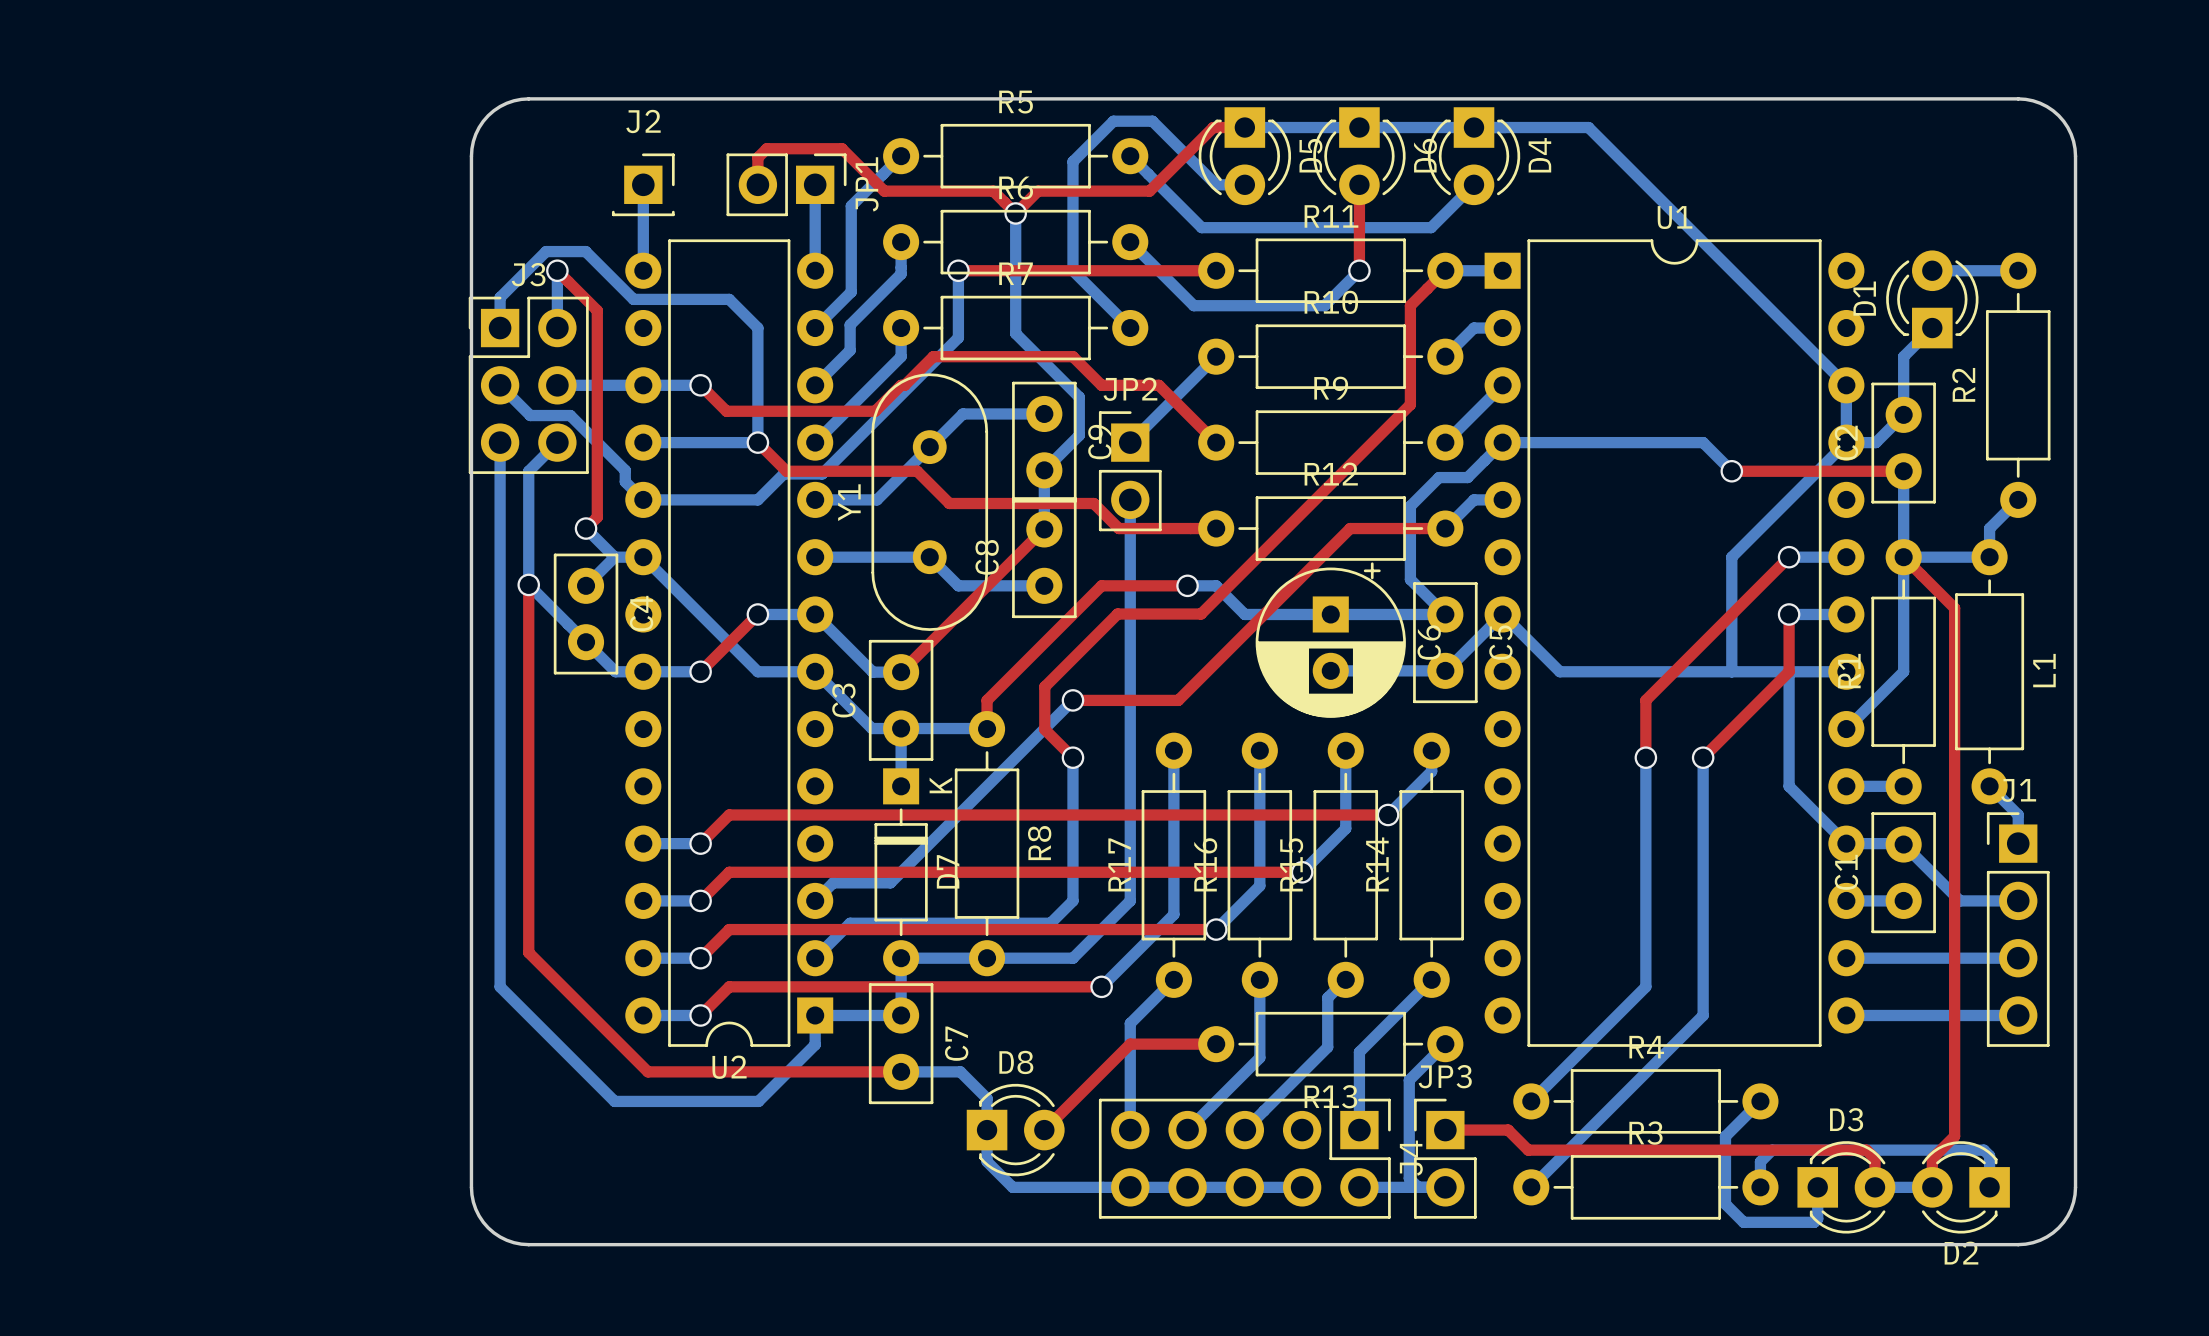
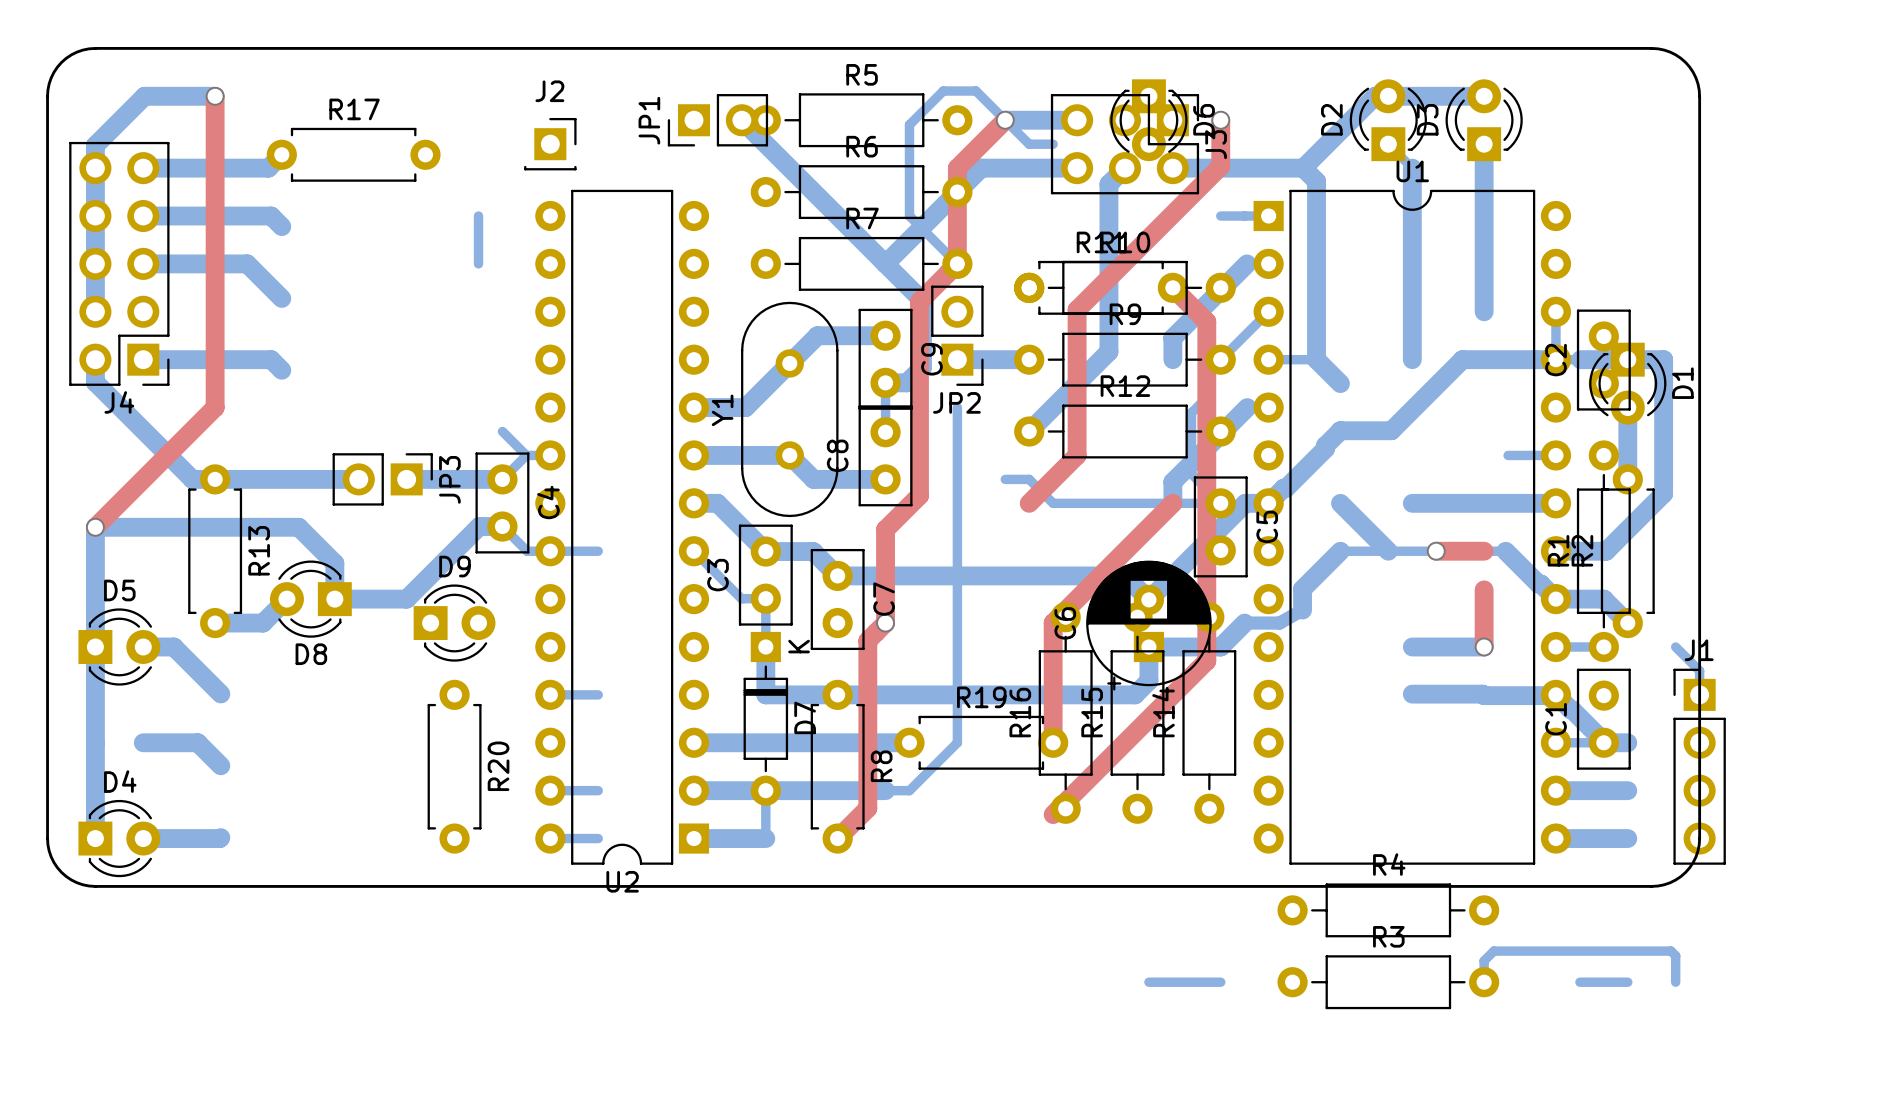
board edge: (528, 98) (2018, 98) (2033, 100) (2053, 110) (2067, 127) (2073, 141) (2075, 156) (2075, 1187) (2071, 1209) (2063, 1222) (2053, 1232) (2040, 1240) (2018, 1244) (528, 1244) (506, 1240) (493, 1232) (479, 1216) (473, 1202) (471, 1187) (471, 156) (475, 134) (488, 115) (506, 103) (528, 98) -> (95, 48) (77, 52) (61, 62) (51, 77) (47, 96) (47, 838) (49, 850) (53, 862) (61, 872) (71, 880) (83, 884) (95, 886) (1651, 886) (1664, 884) (1675, 880) (1685, 872) (1693, 862) (1698, 850) (1699, 838) (1699, 96) (1698, 83) (1693, 72) (1685, 62) (1675, 54) (1664, 50) (1651, 48) (95, 48)
bottom track: none -> (215, 96) (144, 96) (95, 145) (95, 311)
top track: none -> (215, 96) (215, 407) (95, 527)
via: none -> (215, 96)
bottom track: (1244, 127) (1588, 127) (1645, 184) -> none
top track: (1244, 127) (1213, 127) (1149, 191) (1038, 191) (1015, 213) (993, 191) (884, 191) (841, 148) (766, 148) (757, 157) (757, 184) -> none
bottom track: none -> (1484, 96) (1375, 96) (1303, 168)
bottom track: (901, 156) (851, 206) (851, 291) (815, 328) -> none
bottom track: (1130, 156) (1201, 227) (1431, 227) (1474, 184) -> none
bottom track: none -> (1005, 120) (1077, 120)
top track: none -> (1005, 120) (957, 168) (957, 263) (919, 301) (919, 495) (885, 529) (885, 623) (867, 640) (867, 808) (837, 838)
via: none -> (1005, 120)
D5 rotation: 0° (1244, 156) -> 90° counterclockwise (119, 647)
D5 position: (1244, 156) -> (119, 647)
top track: none -> (1220, 120) (1220, 166) (1077, 309) (1077, 455) (1029, 503)
via: none -> (1220, 120)
D4 rotation: 0° (1474, 156) -> 90° counterclockwise (119, 838)
D4 position: (1474, 156) -> (119, 838)
bottom track: (643, 184) (643, 270) -> none
JP1 rotation: 0° (786, 184) -> 180° (717, 120)
bottom track: (815, 184) (815, 270) -> none
top track: (1359, 184) (1359, 270) -> none
bottom track: none -> (1484, 144) (1484, 311)
bottom track: none -> (281, 154) (268, 168) (143, 168)
bottom track: (1015, 213) (1015, 333) (1079, 397) (1079, 435) (1044, 470) -> (741, 120) (922, 300) (922, 367) (906, 382) (885, 382)
via: (1015, 213) -> none
bottom track: none -> (1077, 168) (981, 168) (885, 263)
bottom track: none -> (1124, 168) (1108, 184) (1108, 351) (1029, 431)
bottom track: none -> (1172, 168) (1303, 168)
bottom track: none -> (1303, 168) (1316, 181) (1316, 359) (1340, 383)
bottom track: (1674, 213) (1846, 385) -> (1412, 168) (1412, 359)
R11 footprint: [1198, 238, 1464, 304] -> [1014, 260, 1188, 315]
bottom track: (901, 242) (901, 274) (850, 324) (850, 350) (815, 385) -> none
bottom track: (1130, 242) (1193, 305) (1324, 305) (1359, 270) -> none
R2 footprint: [1985, 252, 2051, 518] -> [1600, 464, 1655, 639]
bottom track: none -> (143, 216) (271, 216) (281, 226)
top track: (557, 270) (597, 310) (597, 517) (586, 528) -> none
via: (557, 270) -> none
bottom track: (958, 270) (958, 337) (822, 473) (783, 473) (757, 499) (643, 499) (625, 481) (625, 470) (570, 415) (530, 415) (500, 385) -> none
top track: (958, 270) (1216, 270) -> none
via: (958, 270) -> none
via: (1359, 270) -> none
top track: (1445, 270) (1410, 305) (1410, 404) (1201, 614) (1117, 614) (1044, 686) (1044, 729) (1072, 757) -> none
bottom track: (1932, 270) (2018, 270) -> none
D1 rotation: 0° (1932, 299) -> 180° (1627, 383)
D1 position: (1932, 299) -> (1627, 383)
bottom track: none -> (143, 263) (247, 263) (281, 298)
bottom track: (500, 328) (500, 297) (546, 251) (585, 251) (633, 299) (729, 299) (757, 328) (757, 442) (643, 442) -> none
bottom track: (901, 328) (901, 356) (815, 442) -> none
bottom track: (1476, 328) (1474, 328) (1445, 356) -> (1247, 263) (1172, 338) (1172, 359)
bottom track: (1932, 328) (1903, 356) (1903, 414) (1875, 442) -> (1555, 551) (1606, 551) (1663, 493) (1663, 359) (1580, 359)
bottom track: (1216, 356) (1130, 442) -> (1029, 359) (957, 359)
top track: none -> (1172, 287) (1206, 321) (1206, 660) (1053, 814)
J3 rotation: 0° (528, 385) -> 90° clockwise (1124, 144)
J3 position: (528, 385) -> (1124, 144)
bottom track: (557, 385) (700, 385) -> none
top track: (700, 385) (726, 411) (875, 411) (933, 356) (1072, 356) (1101, 385) (1158, 385) (1216, 442) -> none
via: (700, 385) -> none
bottom track width: thin (1044, 413) (962, 413) (876, 499) (815, 499) -> thick (885, 335) (817, 335) (745, 407) (694, 407)
bottom track: none -> (95, 359) (95, 382) (192, 479) (358, 479)
bottom track: none -> (143, 359) (271, 359) (281, 370)
bottom track: (500, 442) (500, 986) (614, 1101) (758, 1101) (815, 1044) (815, 1015) -> none
bottom track: (557, 442) (528, 471) (528, 584) (586, 642) -> (95, 838) (95, 527) (298, 527) (334, 563) (334, 599) (406, 599) (479, 526) (502, 526)
top track: (757, 442) (786, 471) (917, 471) (949, 503) (1093, 503) (1118, 528) (1216, 528) -> none
via: (757, 442) -> none
bottom track: (1502, 442) (1467, 477) (1439, 477) (1428, 487) -> none
bottom track: (1559, 442) (1703, 442) (1731, 471) -> none
bottom track: (1846, 442) (1731, 557) (1731, 671) -> (1555, 359) (1462, 359) (1391, 430) (1340, 430)
JP2 rotation: 0° (1130, 471) -> 180° (957, 335)
top track: (1731, 471) (1903, 471) -> none
via: (1731, 471) -> none
bottom track: (1903, 471) (1903, 671) (1846, 729) -> none
bottom track: (1477, 499) (1474, 499) (1445, 528) -> (1247, 407) (1172, 482) (1172, 503)
bottom track: none -> (1627, 407) (1627, 479)
bottom track: (2018, 499) (1989, 528) (1989, 557) (1903, 557) -> none
bottom track: none -> (1340, 430) (1325, 445) (1325, 448) (1268, 503) (1245, 503) (1148, 599) (1124, 575) (837, 575) (813, 551) (765, 551) (717, 503) (694, 503)
via: (586, 528) -> none
top track: (1445, 528) (1350, 528) (1178, 700) (1072, 700) -> none
top track: (1044, 529) (901, 672) -> none
bottom track: (643, 557) (757, 671) (815, 671) -> none
bottom track width: thin (815, 557) (929, 557) (958, 585) (1044, 585) -> thick (694, 455) (789, 455) (813, 479) (885, 479)
top track: (1789, 557) (1645, 700) (1645, 757) -> none
via: (1789, 557) -> none
top track: (1903, 557) (1954, 608) (1954, 1136) (1932, 1158) (1932, 1187) -> none
top track: (528, 584) (528, 952) (647, 1071) (901, 1071) -> none
via: (528, 584) -> none
bottom track: none -> (406, 479) (502, 479)
top track: (1187, 585) (1101, 585) (987, 700) (987, 729) -> none
via: (1187, 585) -> none
bottom track: (757, 614) (815, 614) (872, 672) (901, 672) -> none
top track: (757, 614) (700, 671) -> none
via: (757, 614) -> none
top track: none -> (1172, 503) (1053, 623) (1053, 742)
bottom track: none -> (1340, 503) (1388, 551)
bottom track: none -> (1412, 503) (1508, 503)
bottom track width: thin (1789, 614) (1846, 614) -> thick (1508, 503) (1555, 503)
top track: (1789, 614) (1789, 671) (1703, 757) -> none
via: (1789, 614) -> none
C6 rotation: 0° (1330, 640) -> 180° (1148, 625)
C6 position: (1330, 640) -> (1148, 625)
via: none -> (95, 527)
bottom track: (1330, 670) (1446, 670) (1502, 614) (1559, 671) (1588, 671) -> (765, 647) (765, 694) (1134, 694) (1148, 680) (1148, 647) (1220, 647) (1244, 623) (1279, 623) (1302, 610) (1302, 589) (1340, 551)
via: (700, 671) -> none
top track: none -> (1436, 551) (1484, 551)
via: none -> (1436, 551)
bottom track: (1786, 671) (1846, 671) -> (1505, 551) (1555, 599) (1603, 599) (1627, 623)
bottom track: (1789, 671) (1789, 786) (1846, 843) (1902, 843) (1960, 900) (2018, 900) -> none
L1: (1989, 671) -> none
bottom track: (1072, 700) (890, 882) (833, 882) (815, 900) -> (909, 742) (694, 742)
via: (1072, 700) -> none
R8 footprint: [954, 711, 1020, 977] -> [810, 679, 865, 854]
top track: none -> (1484, 589) (1484, 647)
bottom track: (901, 728) (987, 729) -> none
bottom track: none -> (286, 599) (263, 623) (215, 623)
R17 footprint: [1141, 732, 1207, 998] -> [266, 127, 441, 182]
bottom track: (1173, 750) (1173, 914) (1101, 986) -> none
bottom track: (1259, 750) (1259, 885) (1216, 929) -> none
bottom track: (1345, 750) (1345, 828) (1302, 872) -> none
bottom track: (1431, 750) (1431, 771) (1388, 814) -> none
D9: none -> (454, 623)
bottom track: (1072, 757) (1072, 900) (1050, 923) (850, 923) (815, 958) -> (765, 790) (694, 790)
via position: (1072, 757) -> (885, 623)
bottom track: (1645, 757) (1645, 986) (1531, 1101) -> none
via: (1645, 757) -> none
bottom track: (1703, 757) (1703, 1015) (1531, 1187) -> none
via: (1703, 757) -> none
bottom track: none -> (143, 647) (173, 647) (220, 693)
via: none -> (1484, 647)
top track: (1388, 814) (729, 814) (700, 843) -> none
via: (1388, 814) -> none
bottom track: none -> (1412, 694) (1555, 694) (1605, 742) (1627, 742)
via: (700, 843) -> none
R17 name position: R17 (1119, 864) -> R17 (354, 109)
top track: (1302, 872) (729, 872) (700, 900) -> none
via: (1302, 872) -> none
bottom track: none -> (143, 742) (197, 742) (220, 765)
bottom track: (643, 900) (700, 900) -> none
via: (700, 900) -> none
R19: none -> (981, 742)
R20: none -> (454, 766)
top track: (1216, 929) (729, 929) (700, 958) -> none
via: (1216, 929) -> none
via: (700, 958) -> none
bottom track width: thin (901, 958) (1044, 958) -> thick (765, 790) (885, 790)
bottom track width: thin (1846, 958) (1932, 958) -> thick (1555, 790) (1627, 790)
bottom track: (1932, 958) (2018, 958) -> (1412, 647) (1484, 647)
bottom track: (1173, 979) (1130, 1023) (1130, 1130) -> none
bottom track: (1259, 979) (1259, 1057) (1187, 1130) -> none
bottom track: (1345, 979) (1327, 997) (1327, 1047) (1244, 1130) -> none
bottom track: (1431, 979) (1359, 1052) (1359, 1130) -> none
top track: (1101, 986) (729, 986) (700, 1015) -> none
via: (1101, 986) -> none
R13 footprint: [1198, 1011, 1464, 1077] -> [188, 464, 243, 639]
bottom track: none -> (220, 837) (143, 838)
via: (700, 1015) -> none
bottom track width: thin (815, 1015) (901, 1015) -> thick (694, 838) (765, 838)
bottom track width: thin (1846, 1015) (1932, 1015) -> thick (1555, 838) (1627, 838)
bottom track: (1932, 1015) (2018, 1015) -> none
C7 position: (901, 1043) -> (837, 599)
top track: (1216, 1044) (1130, 1044) (1044, 1130) -> none
bottom track: (1445, 1044) (1409, 1080) (1409, 1178) (1418, 1187) -> none
bottom track: (901, 1071) (960, 1071) (987, 1098) (987, 1161) (1012, 1187) (1302, 1187) -> none
R13 name position: R13 (1330, 1096) -> R13 (259, 550)
bottom track: (1760, 1101) (1725, 1136) (1725, 1204) (1743, 1222) (1814, 1222) (1817, 1218) (1817, 1187) -> none
D8 rotation: 0° (1015, 1130) -> 180° (310, 599)
D8 position: (1015, 1130) -> (310, 599)
top track: (1445, 1130) (1508, 1130) (1528, 1150) (1866, 1150) (1875, 1158) (1875, 1187) -> none
J4 rotation: 0° (1244, 1158) -> 90° clockwise (119, 263)
J4 position: (1244, 1158) -> (119, 263)
JP3 rotation: 0° (1445, 1158) -> 90° clockwise (382, 479)
JP3 position: (1445, 1158) -> (382, 479)
D3 rotation: 0° (1846, 1187) -> 90° counterclockwise (1484, 120)
D3 position: (1846, 1187) -> (1484, 120)
D2 rotation: 0° (1960, 1187) -> 90° clockwise (1388, 120)
D2 position: (1960, 1187) -> (1388, 120)

